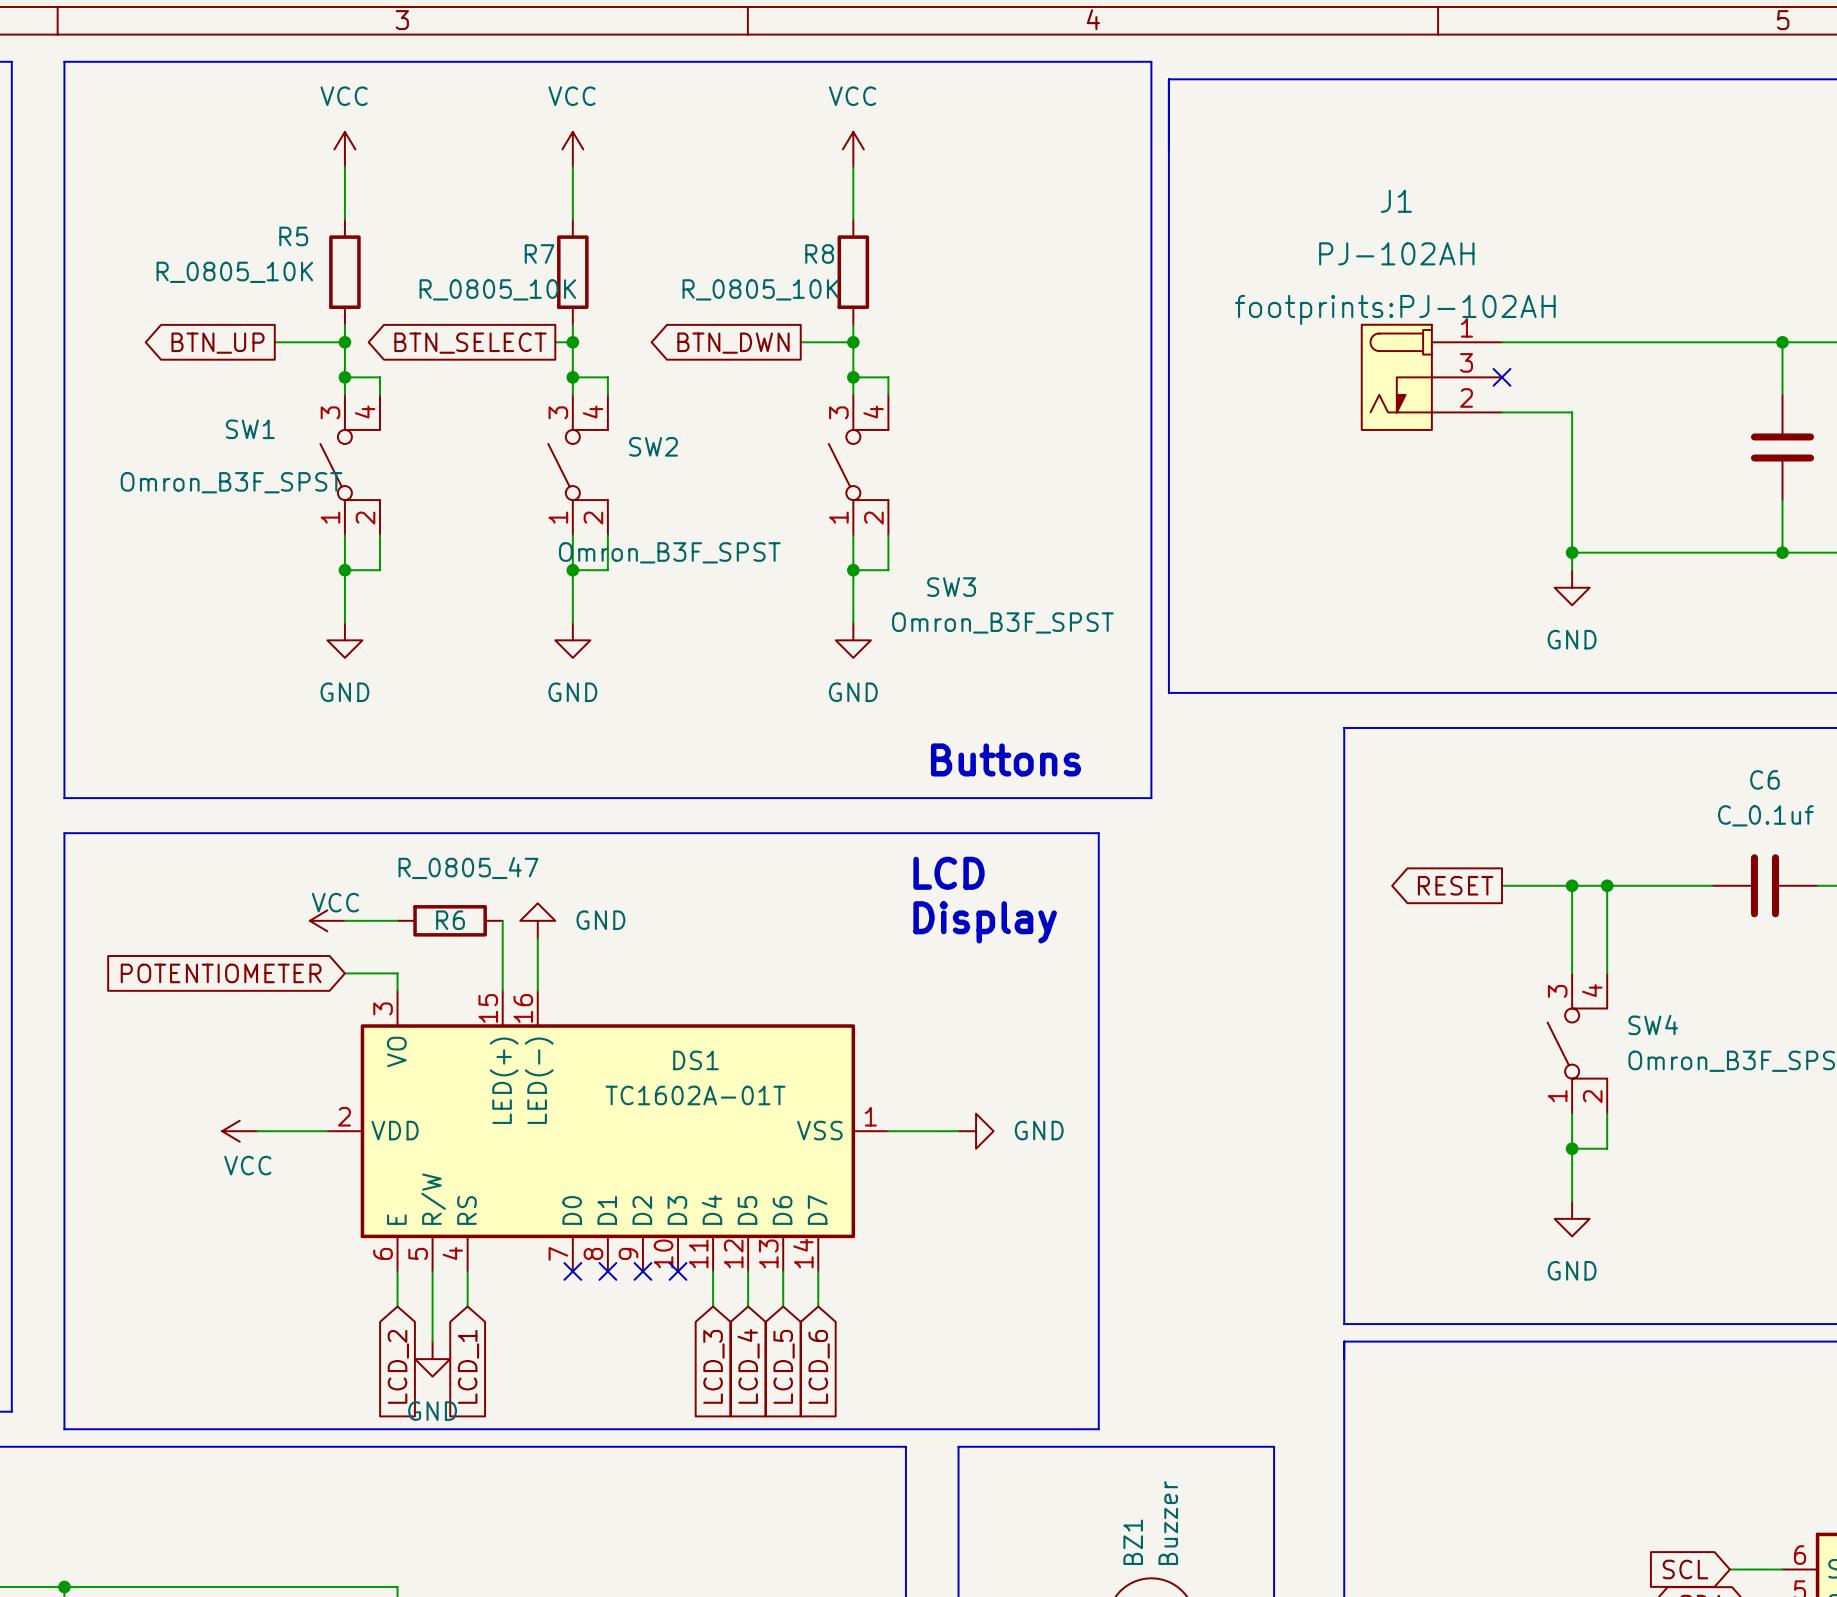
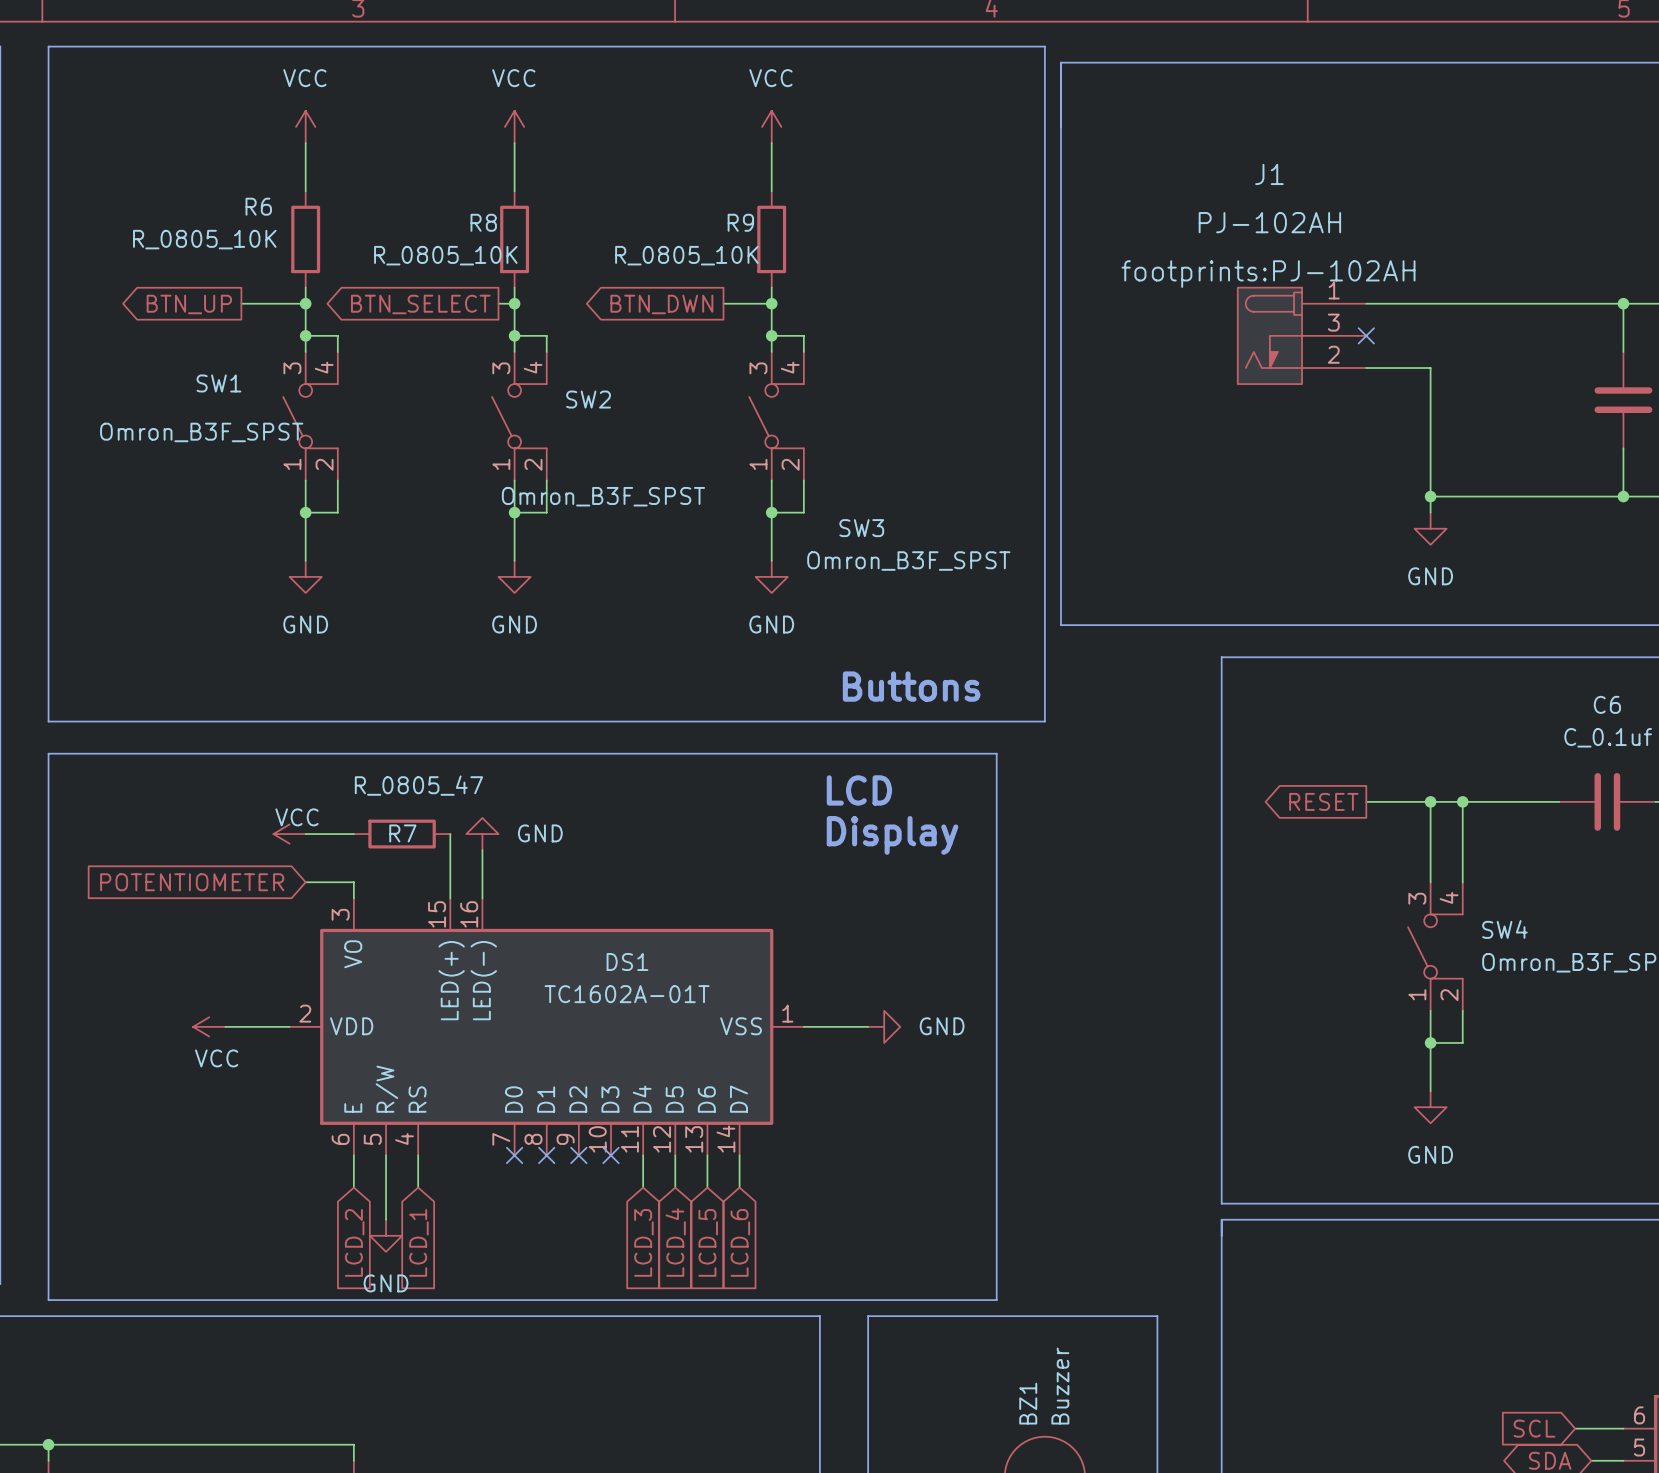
R5 name: R5 (293, 236) -> R6 (258, 206)
R7 name: R7 (539, 253) -> R8 (483, 222)
R8 name: R8 (819, 253) -> R9 (740, 222)
R6 name: R6 (450, 920) -> R7 (402, 833)

